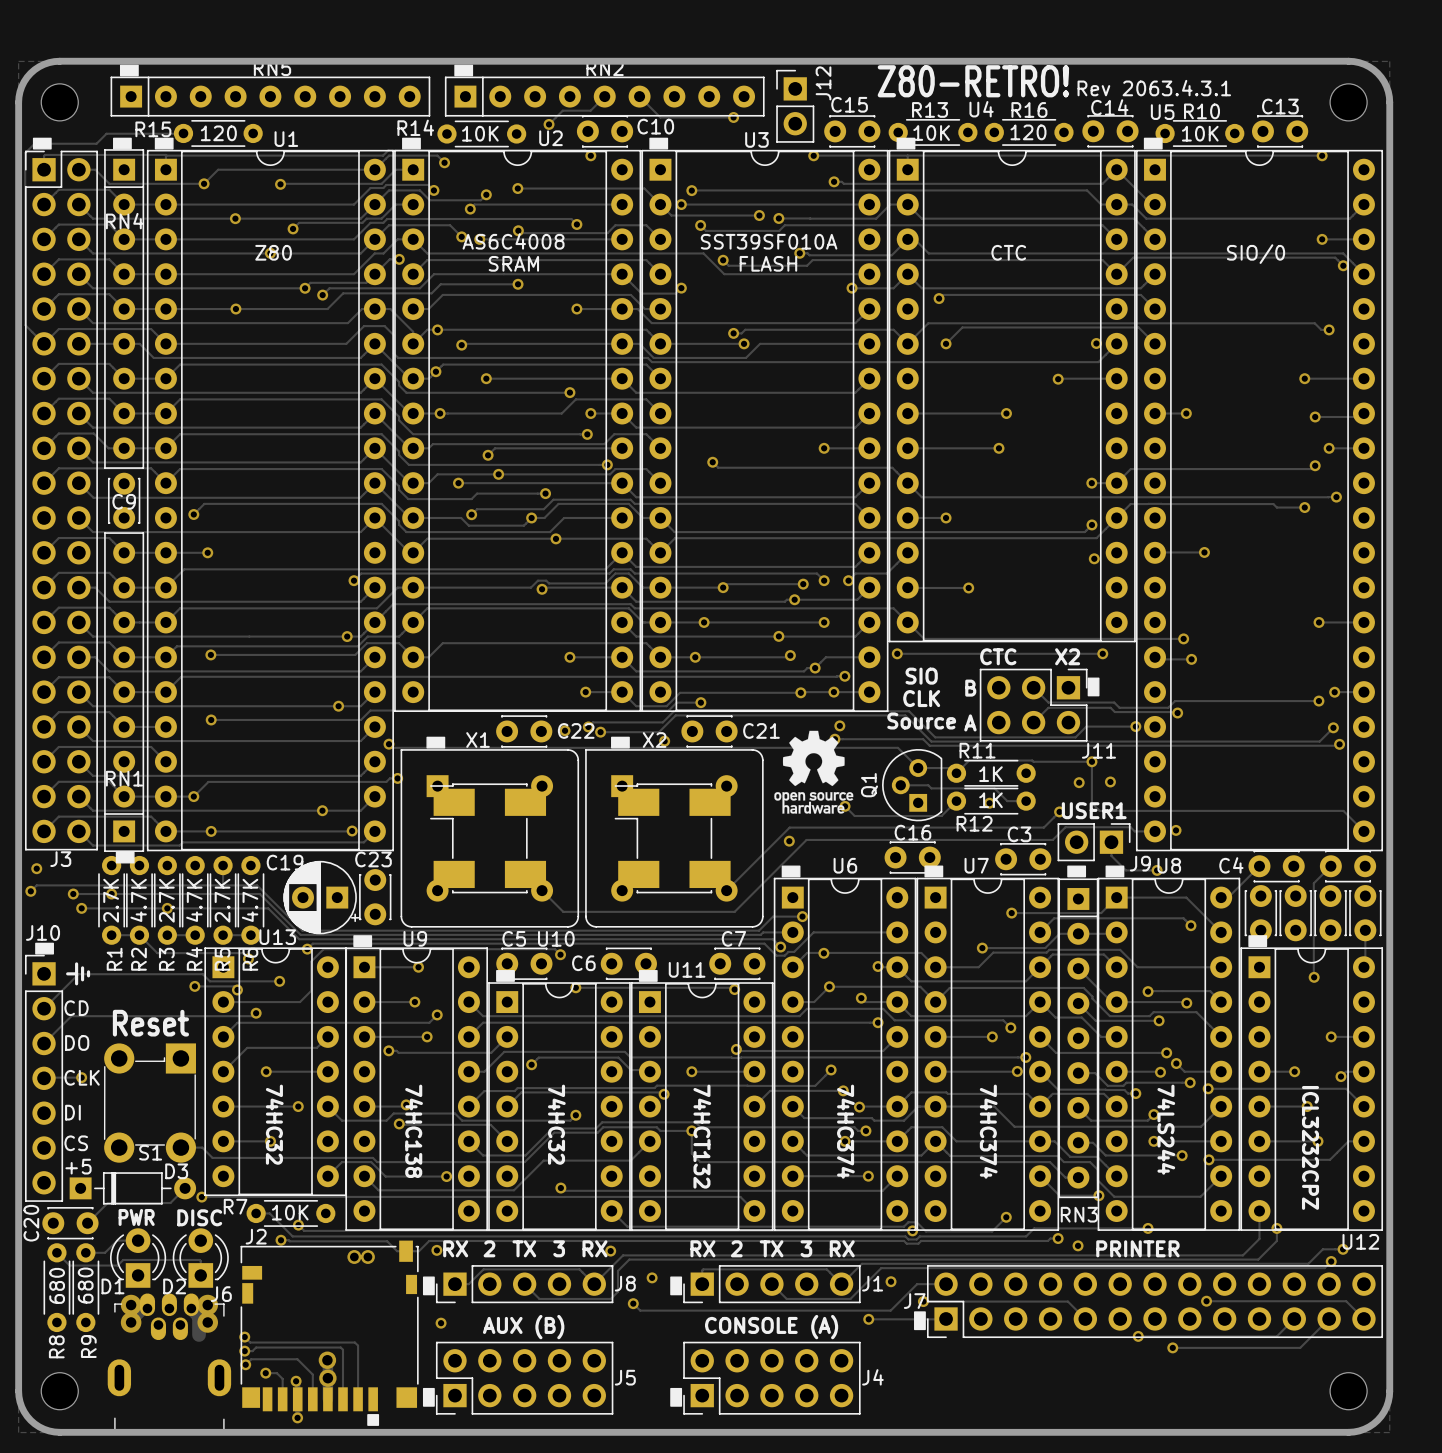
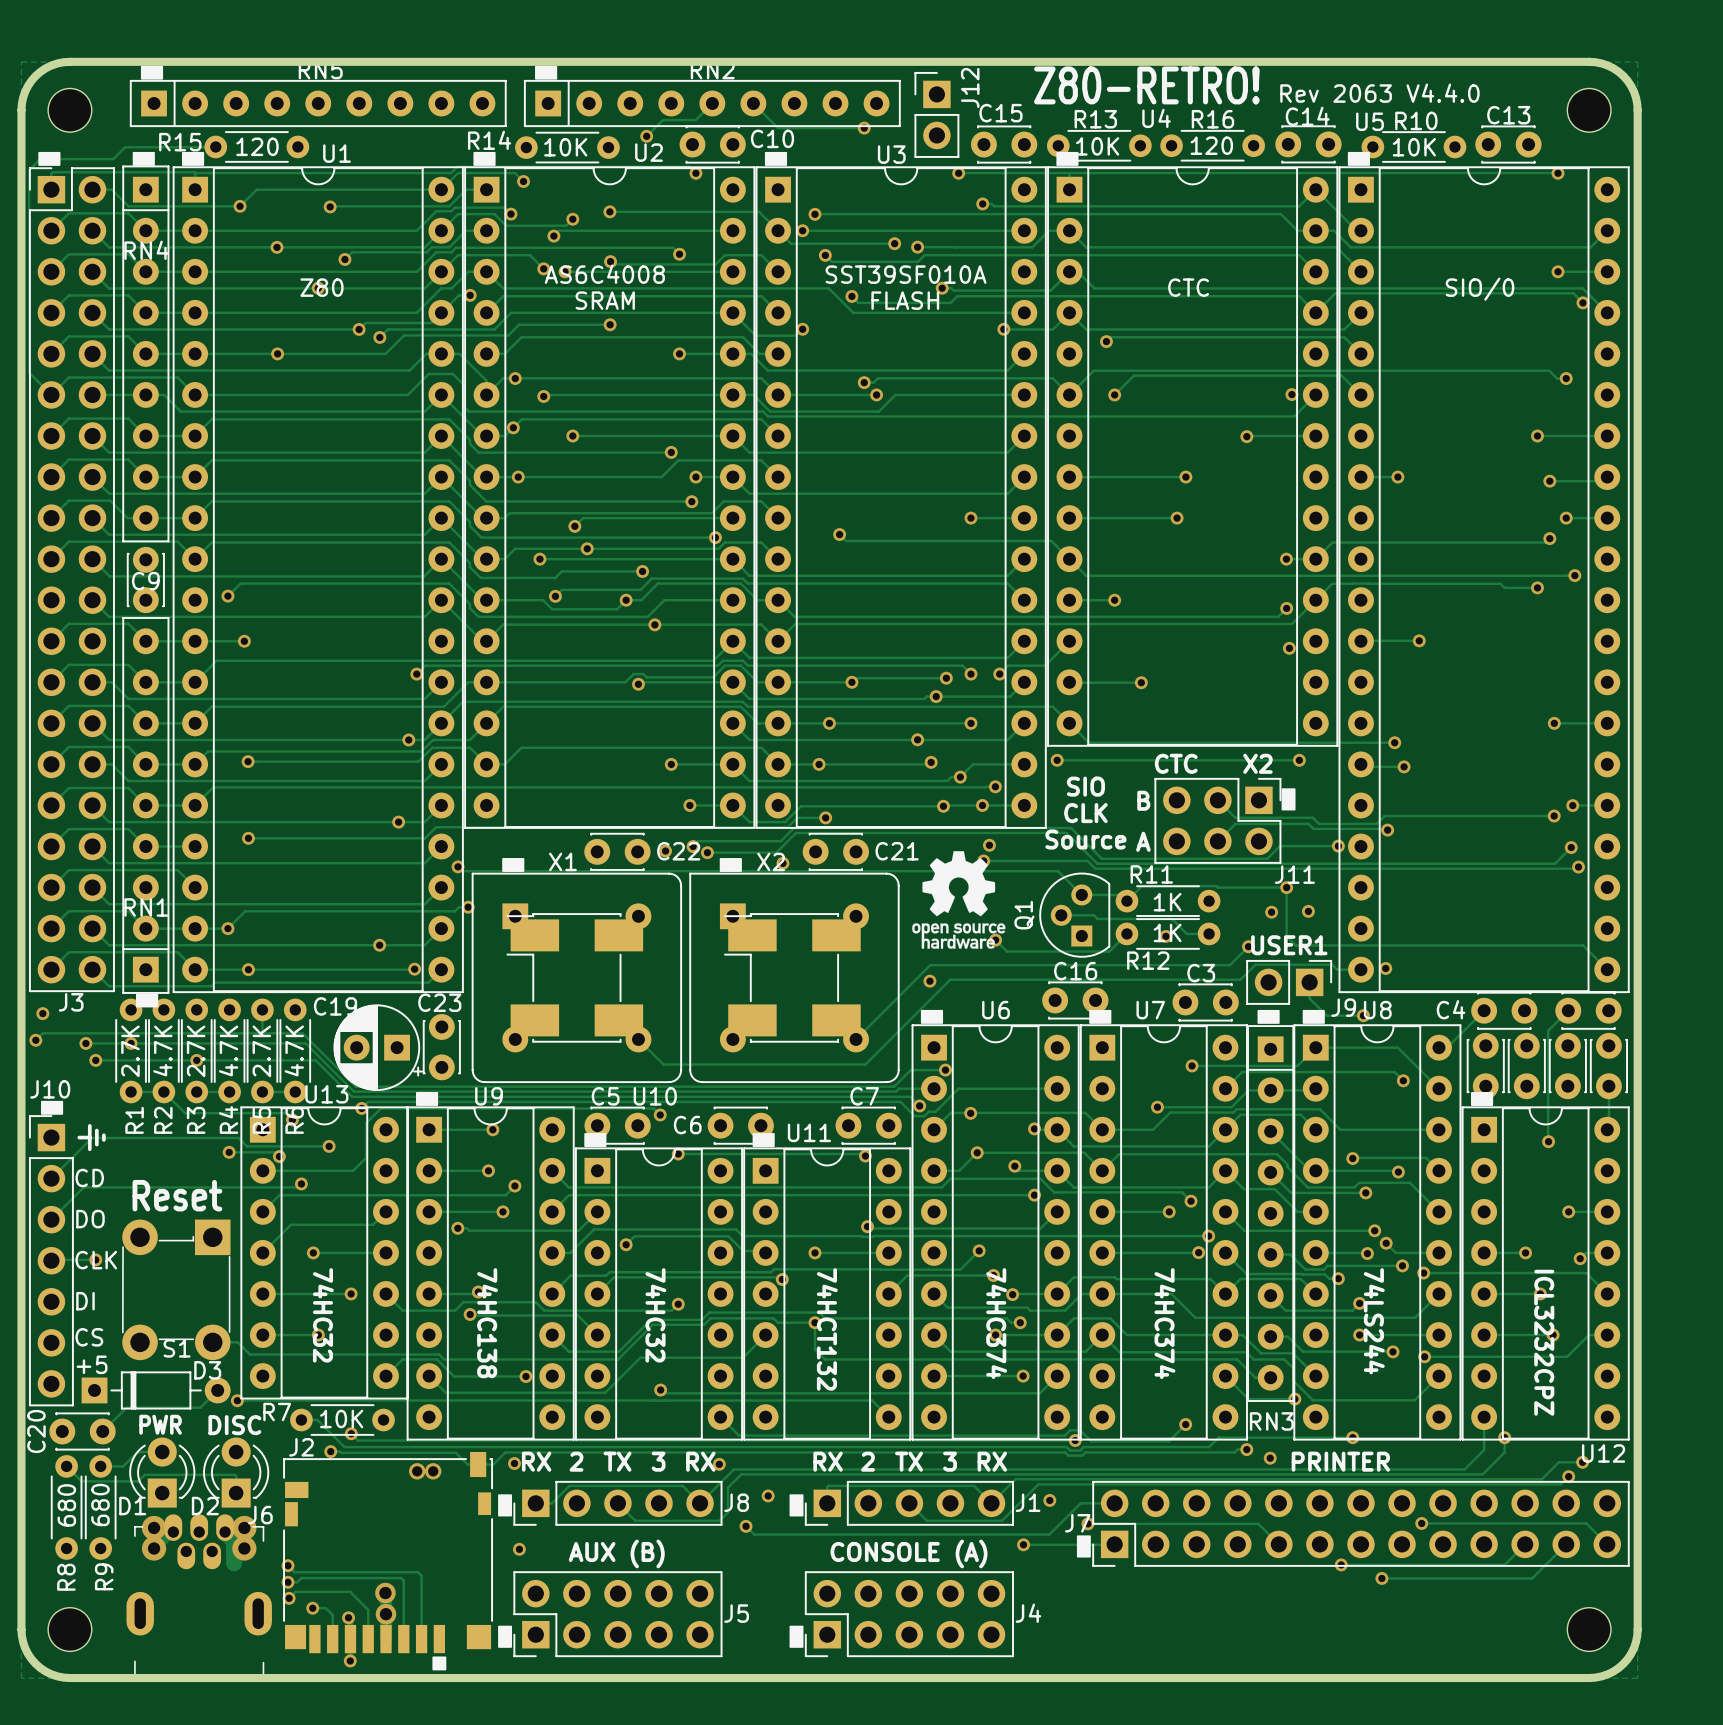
text: Rev 2063.4.3.1 (1154, 88) -> Rev 2063 V4.4.0 (1379, 93)

